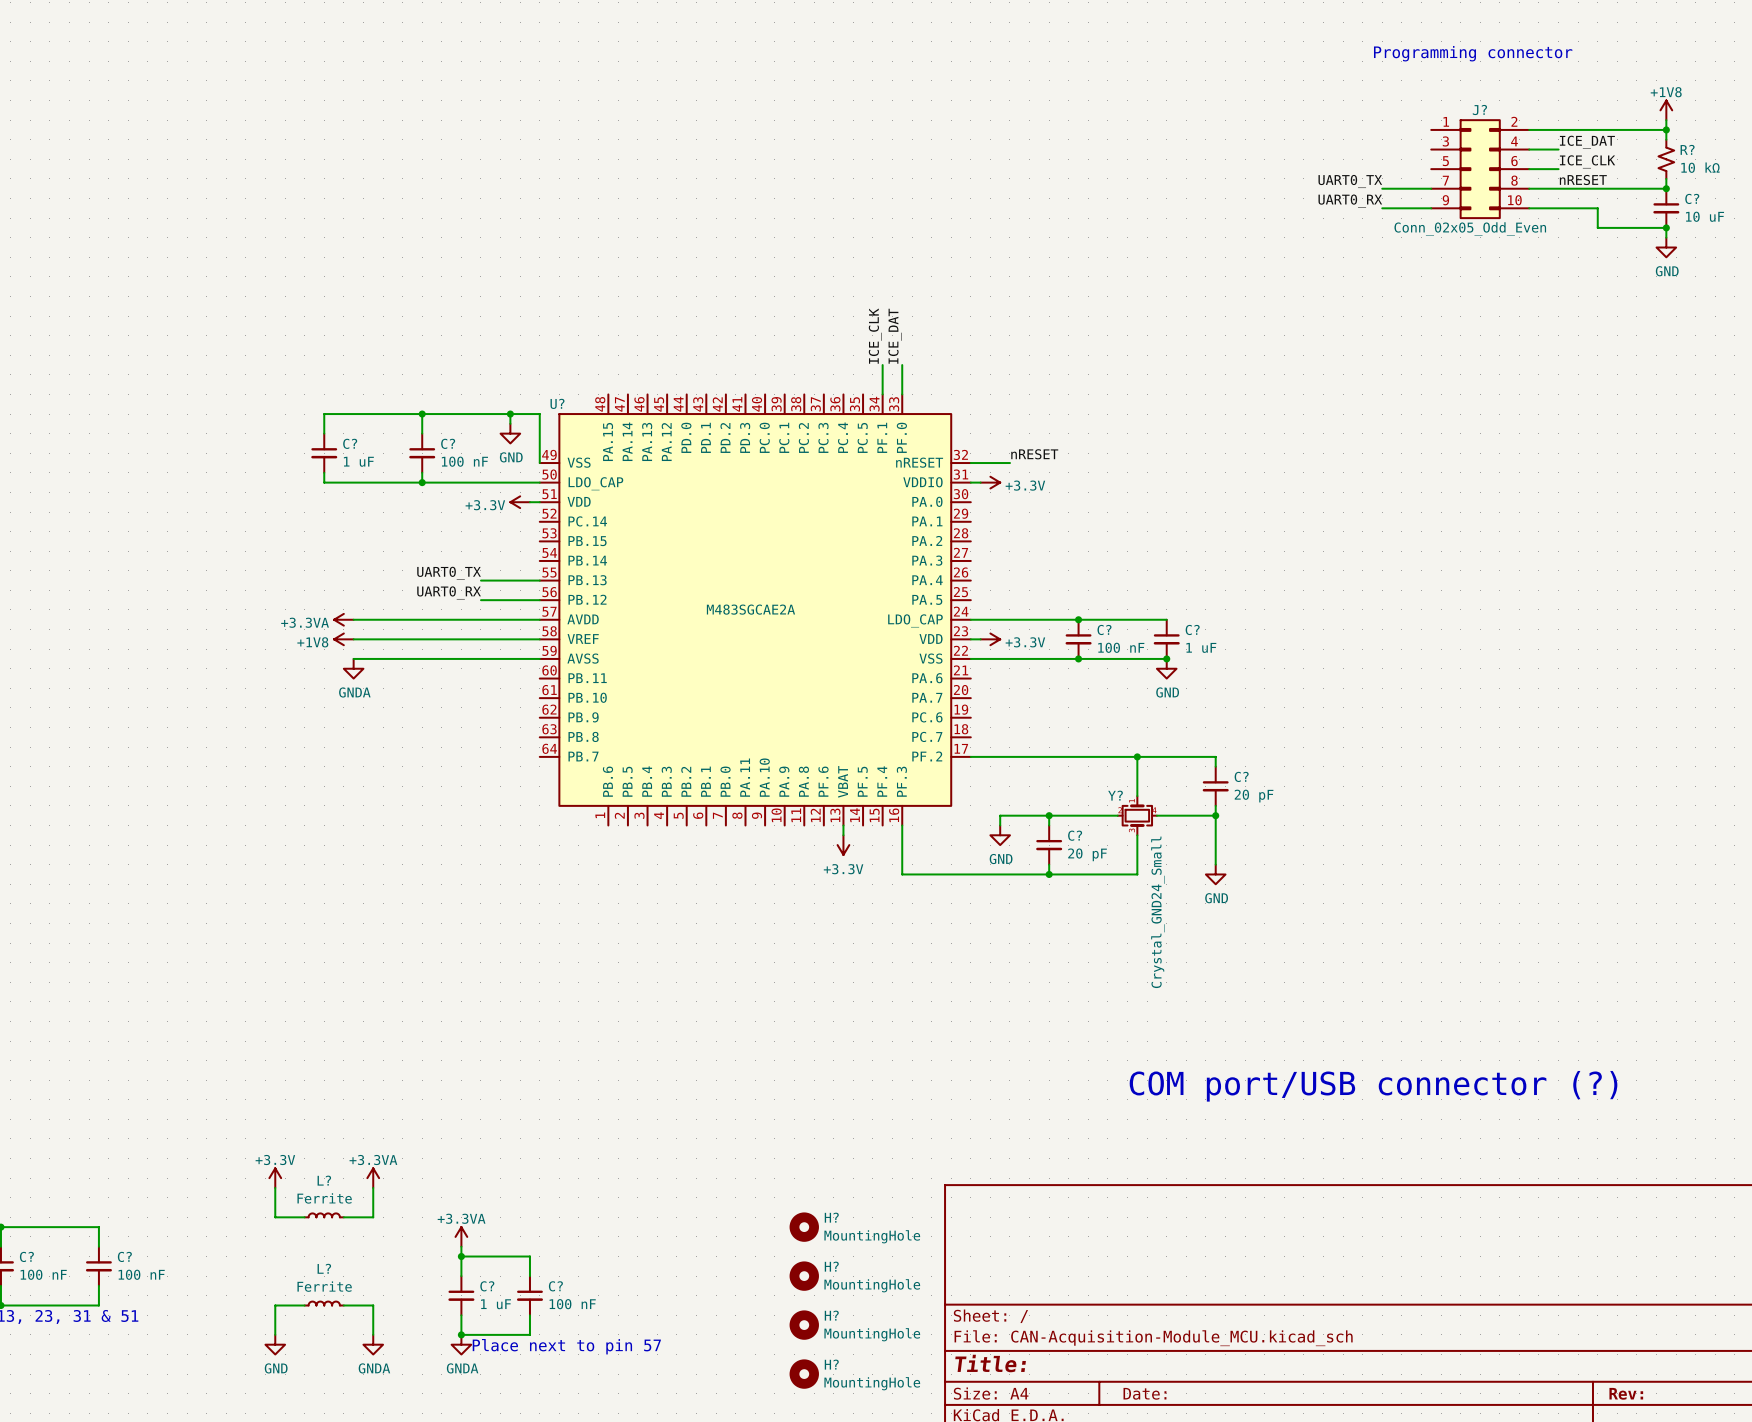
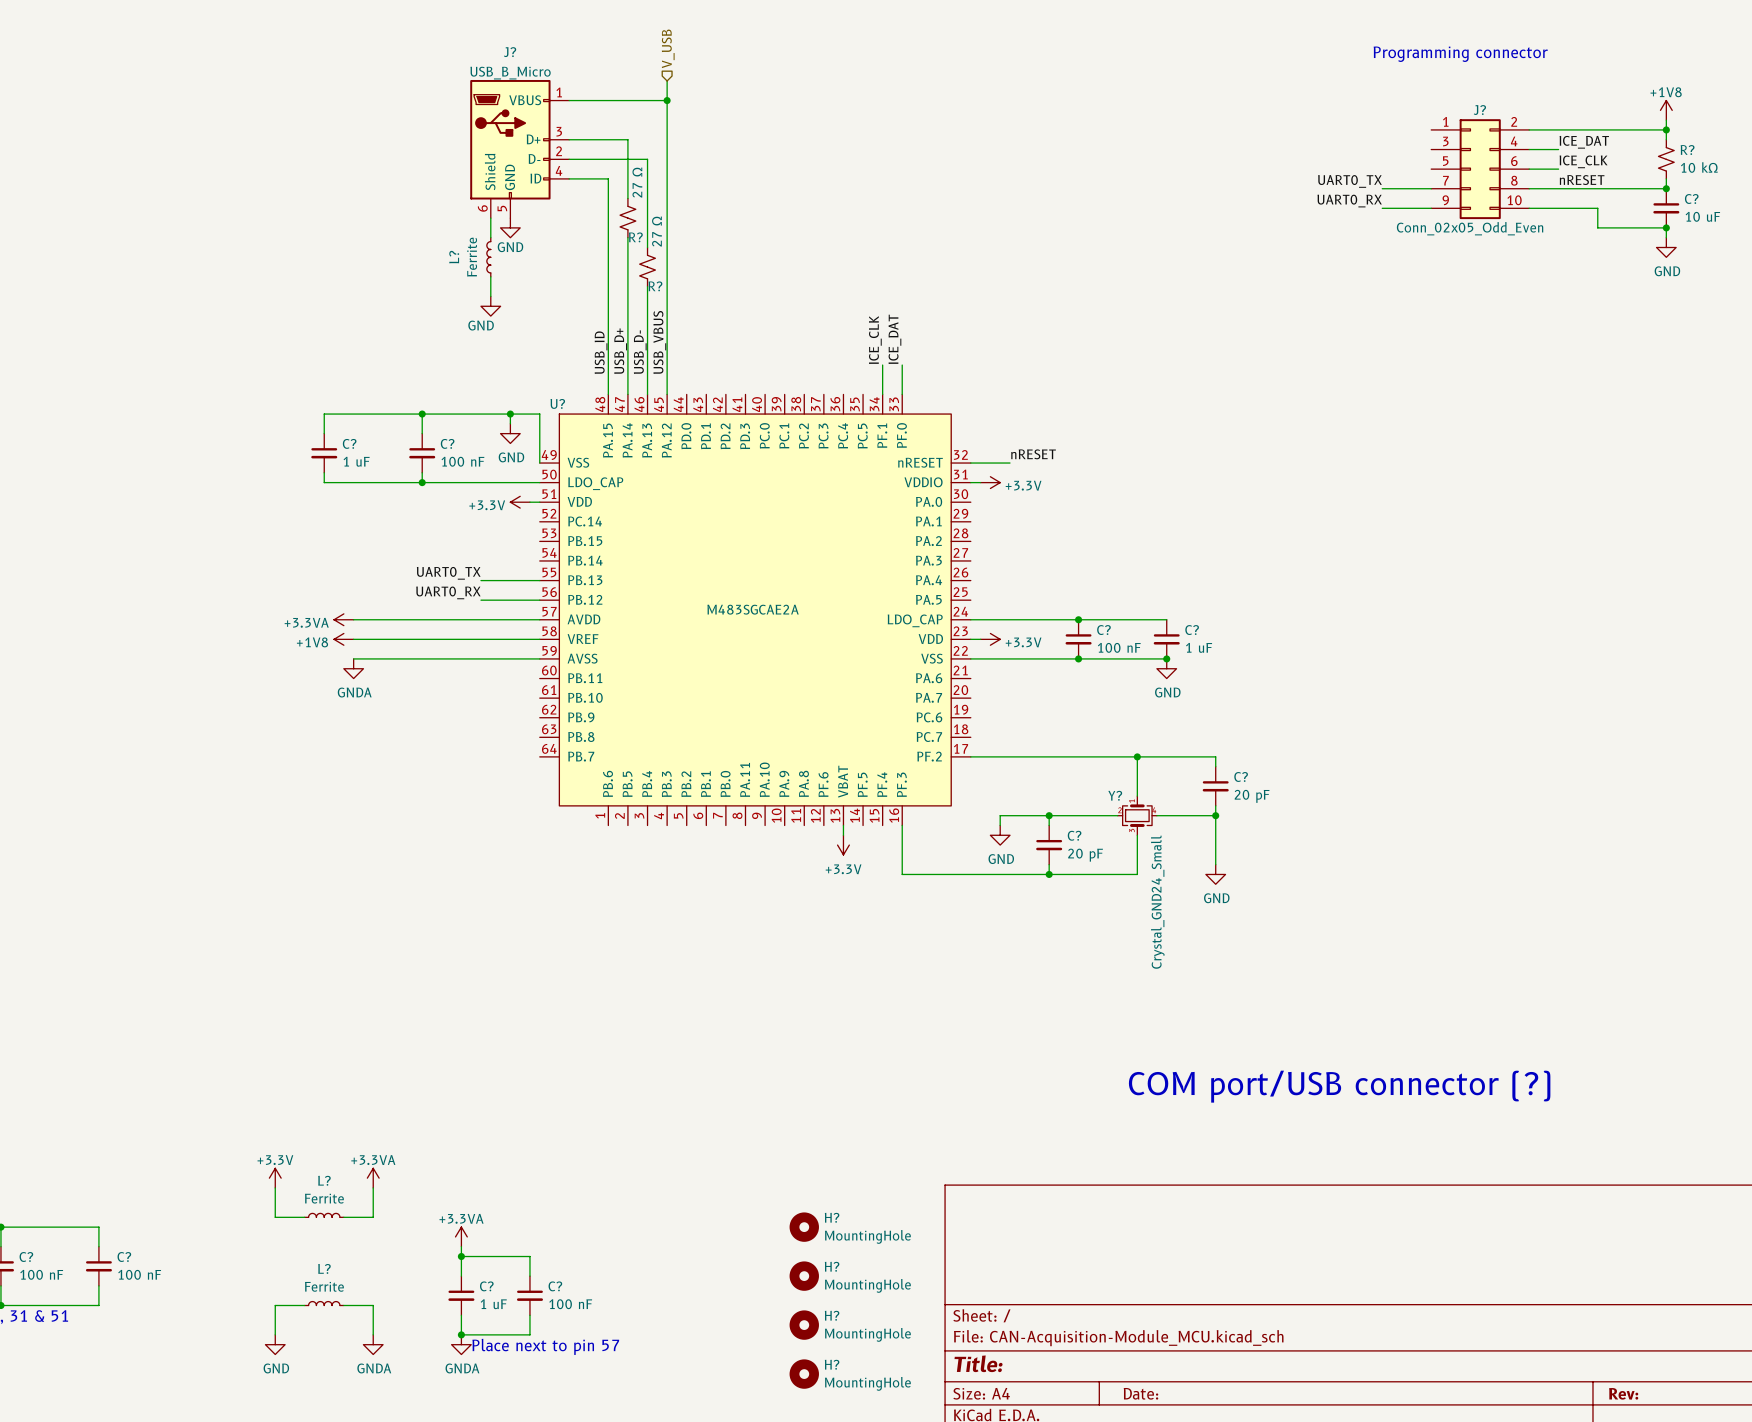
hierarchical label: none -> V_USB (668, 48)
wire: none -> (667, 80) (667, 394)
wire: none -> (569, 100) (667, 100)
junction: none -> (667, 100)
wire: none -> (569, 139) (627, 139) (627, 198)
J?: none -> USB_B_Micro (519, 149)
wire: none -> (569, 159) (647, 159) (647, 247)
wire: none -> (569, 178) (608, 178) (608, 394)
wire: none -> (490, 218) (490, 237)
R?: none -> 27 Ω (627, 218)
power symbol: none -> GND (510, 227)
wire: none -> (627, 237) (627, 394)
L?: none -> Ferrite (488, 257)
R?: none -> 27 Ω (647, 267)
wire: none -> (490, 276) (490, 296)
wire: none -> (647, 286) (647, 394)
power symbol: none -> GND (490, 306)
label: none -> USB_VBUS (659, 342)
label: none -> USB_ID (601, 352)
label: none -> USB_D+ (620, 351)
label: none -> USB_D- (640, 352)

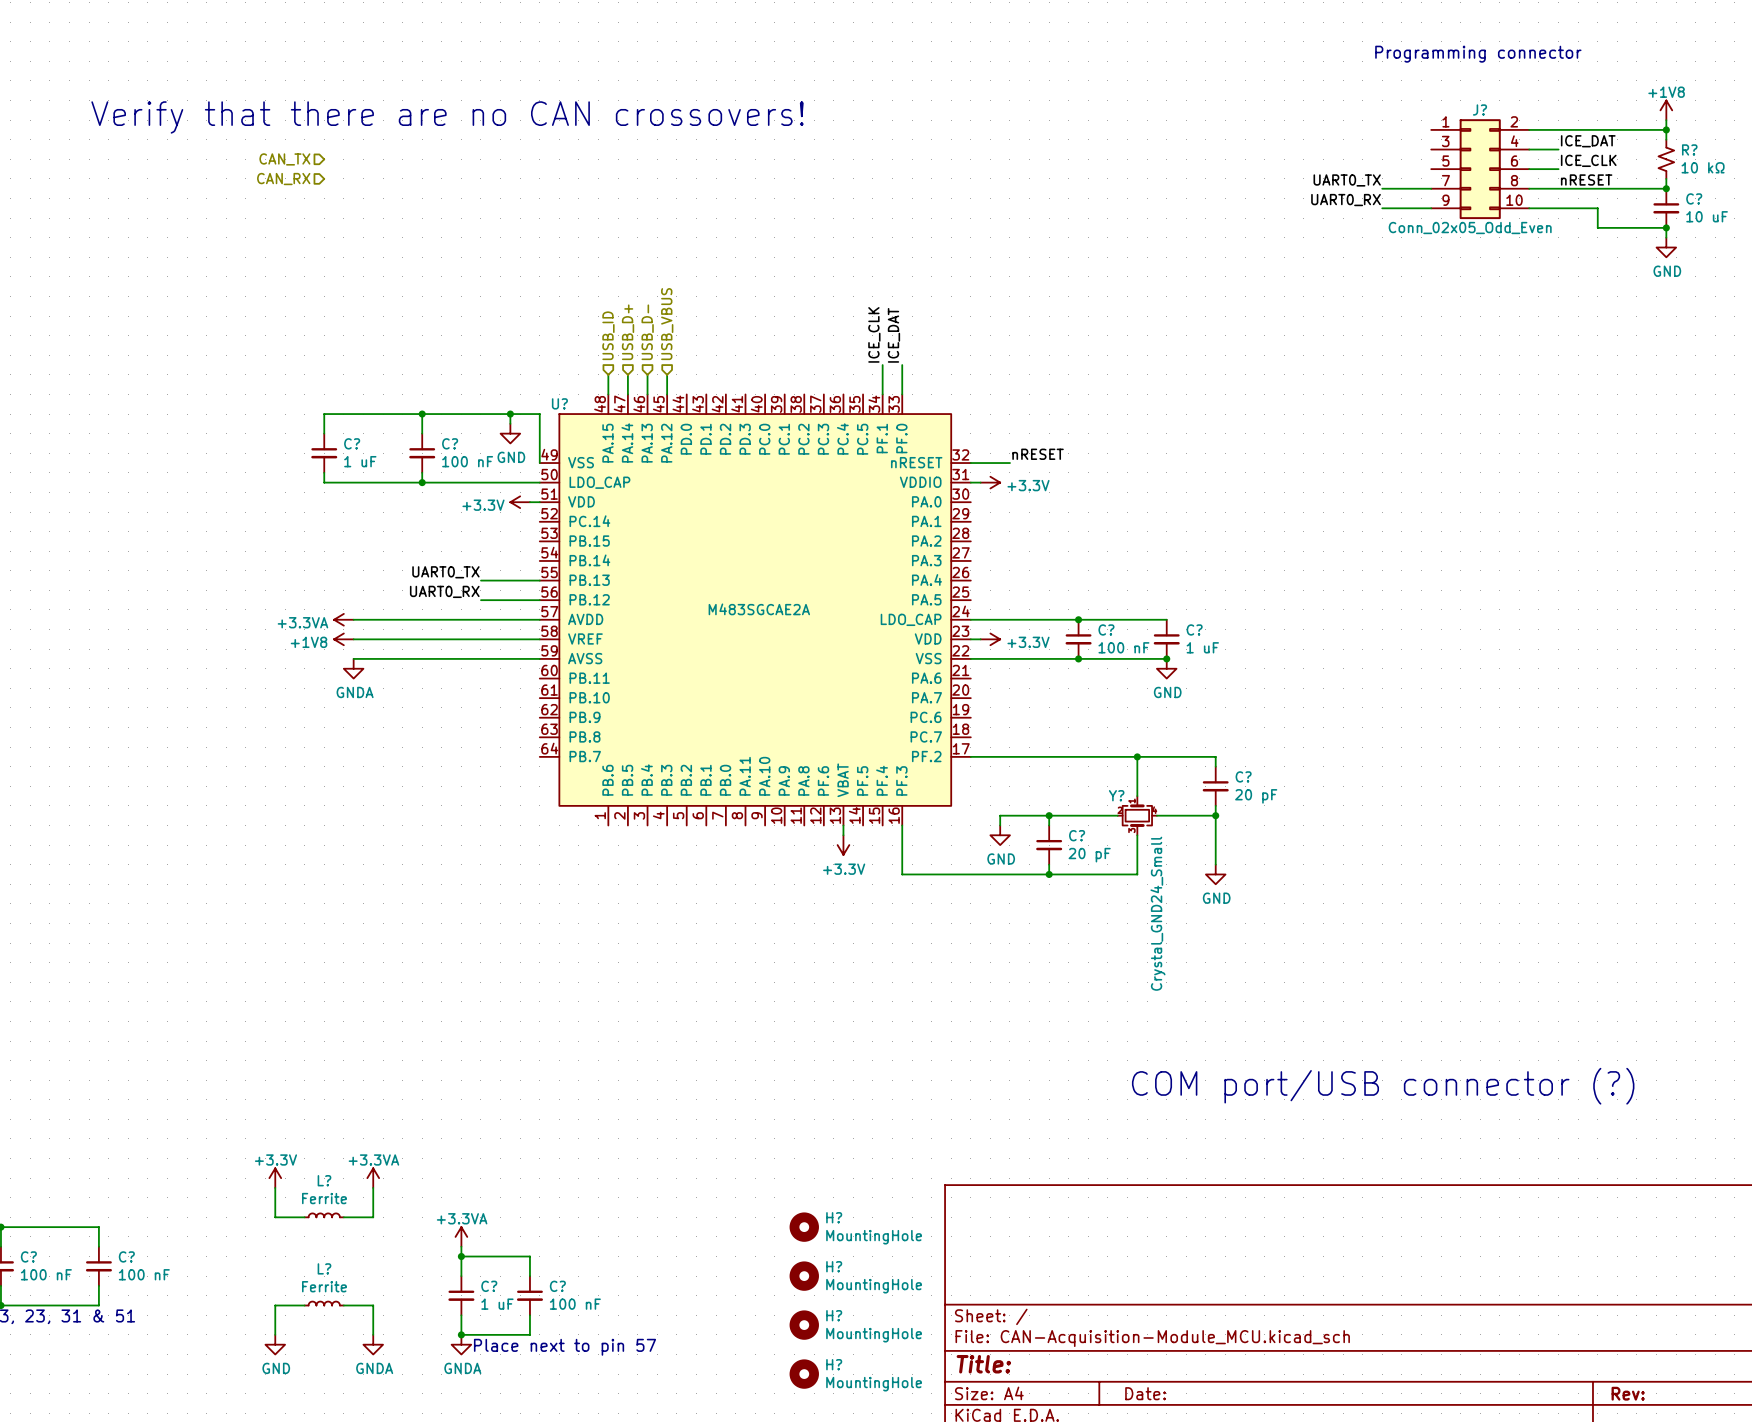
hierarchical label: V_USB (668, 48) -> none
wire: (667, 80) (667, 374) -> none
wire: (569, 100) (667, 100) -> none
junction: (667, 100) -> none
text: none -> Verify that there are no CAN crossovers! (447, 117)
wire: (569, 139) (627, 139) (627, 198) -> none
J?: USB_B_Micro (519, 149) -> none
wire: (569, 159) (647, 159) (647, 247) -> none
hierarchical label: none -> CAN_TX (284, 159)
wire: (569, 178) (608, 178) (608, 374) -> none
hierarchical label: none -> CAN_RX (283, 179)
wire: (490, 218) (490, 237) -> none
R?: 27 Ω (627, 218) -> none
power symbol: GND (510, 227) -> none
wire: (627, 237) (627, 374) -> none
L?: Ferrite (488, 257) -> none
R?: 27 Ω (647, 267) -> none
wire: (490, 276) (490, 296) -> none
wire: (647, 286) (647, 374) -> none
power symbol: GND (490, 306) -> none
hierarchical label: none -> USB_VBUS (667, 324)
hierarchical label: none -> USB_D+ (628, 332)
hierarchical label: none -> USB_D- (647, 332)
hierarchical label: none -> USB_ID (608, 335)
label: USB_VBUS (659, 342) -> none
label: USB_D+ (620, 351) -> none
label: USB_ID (601, 352) -> none
label: USB_D- (640, 352) -> none

